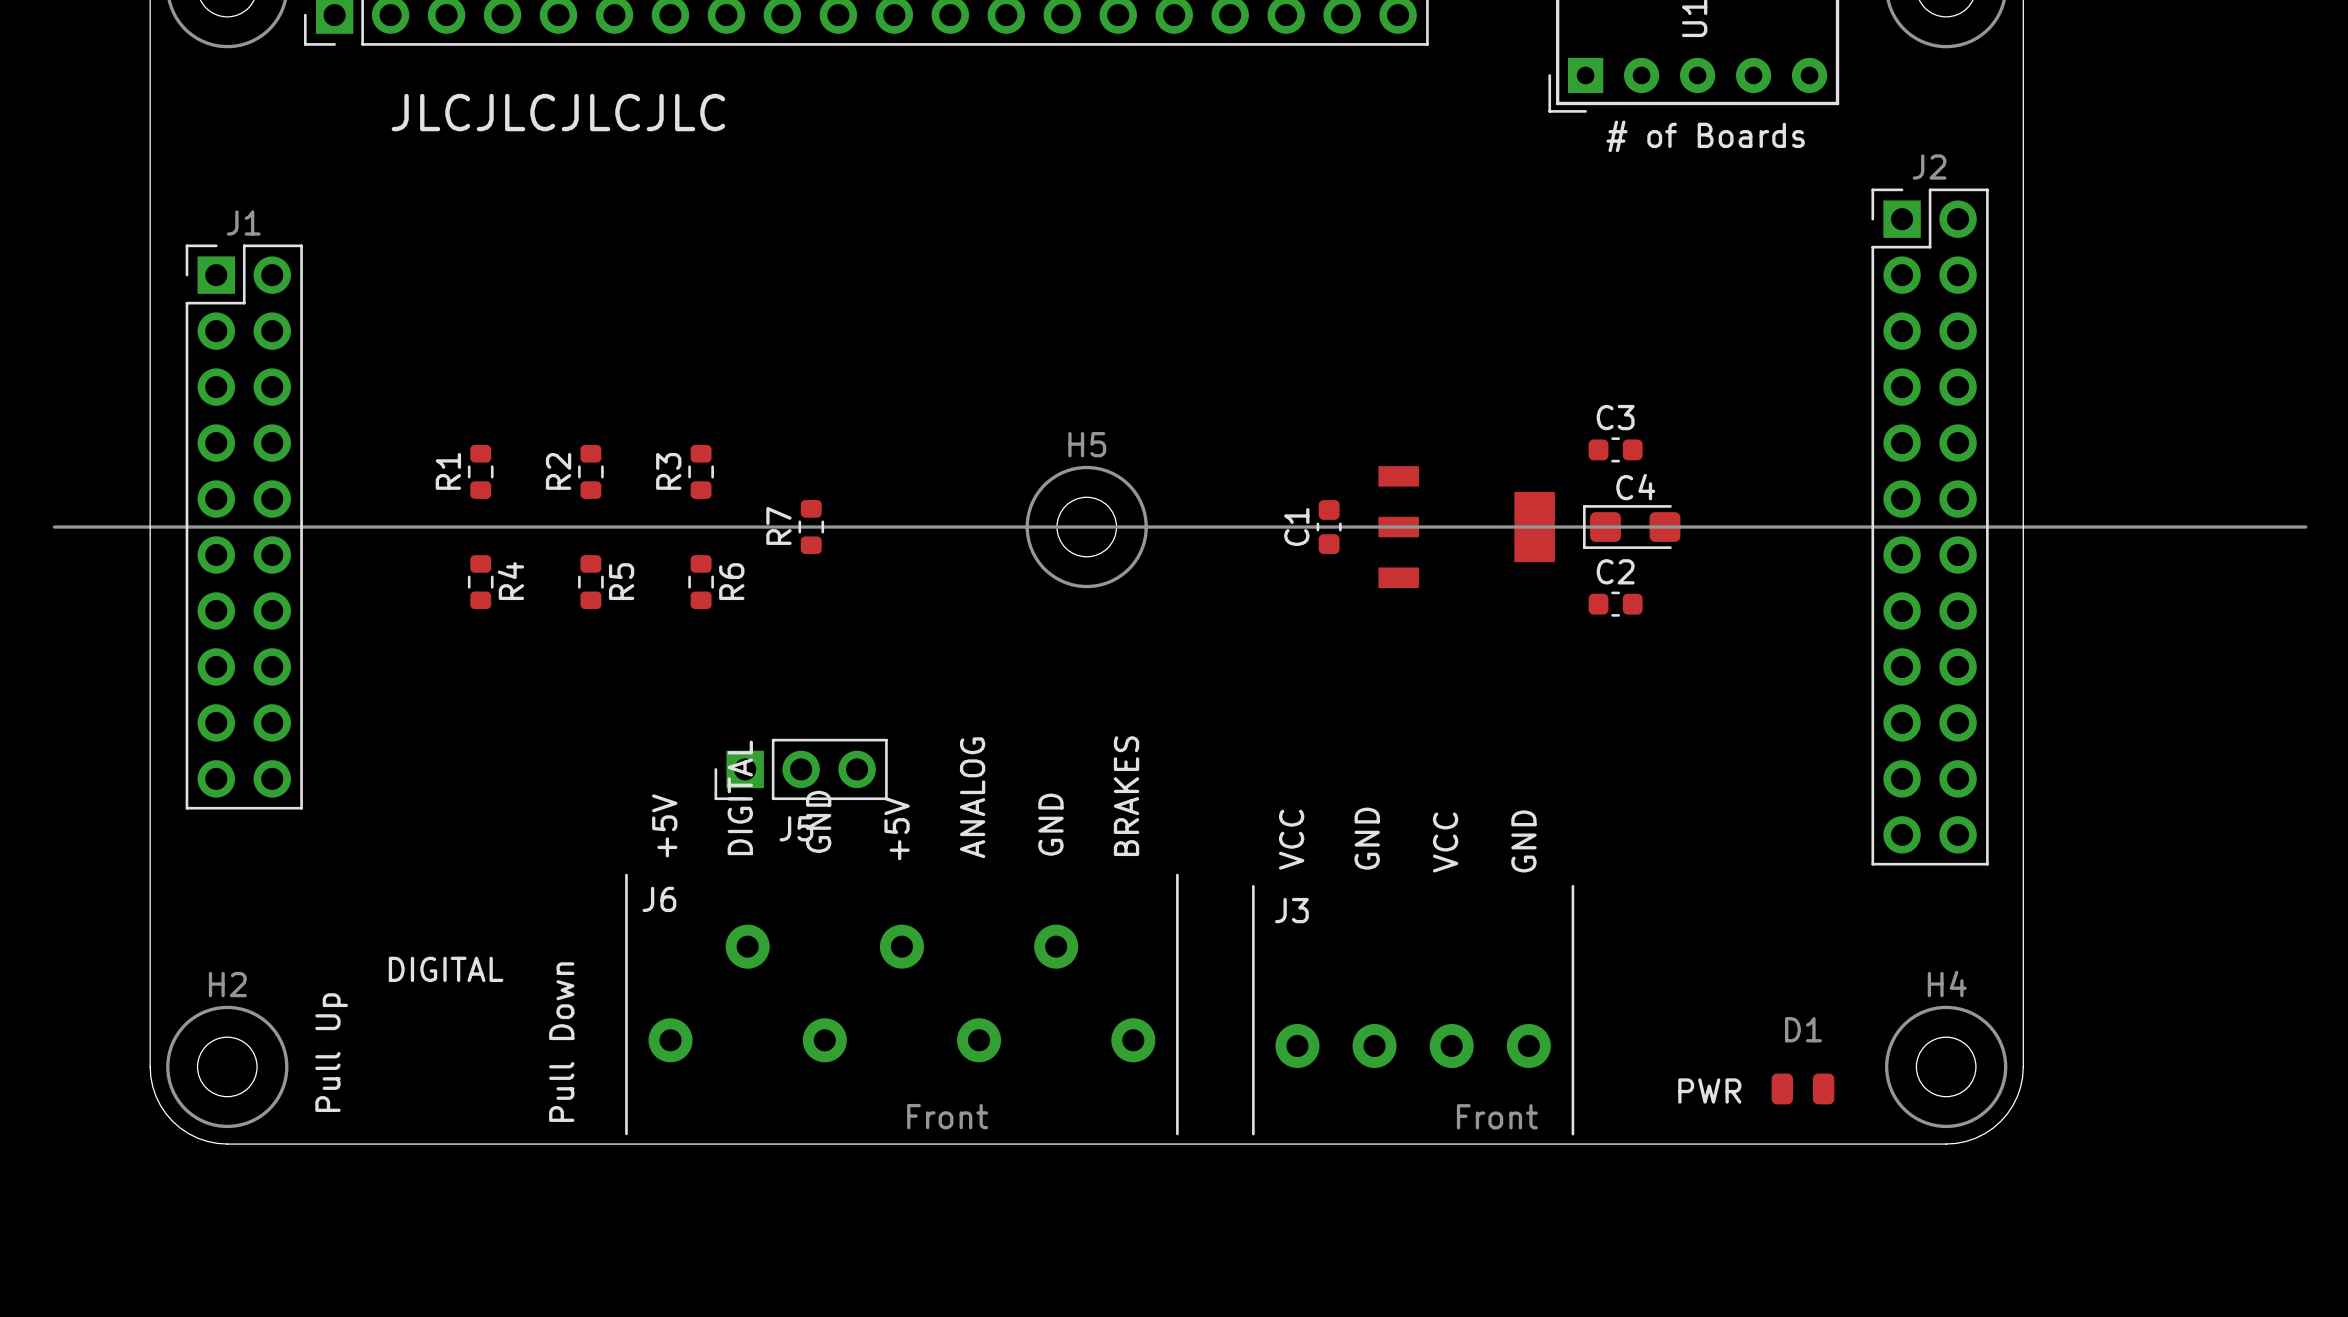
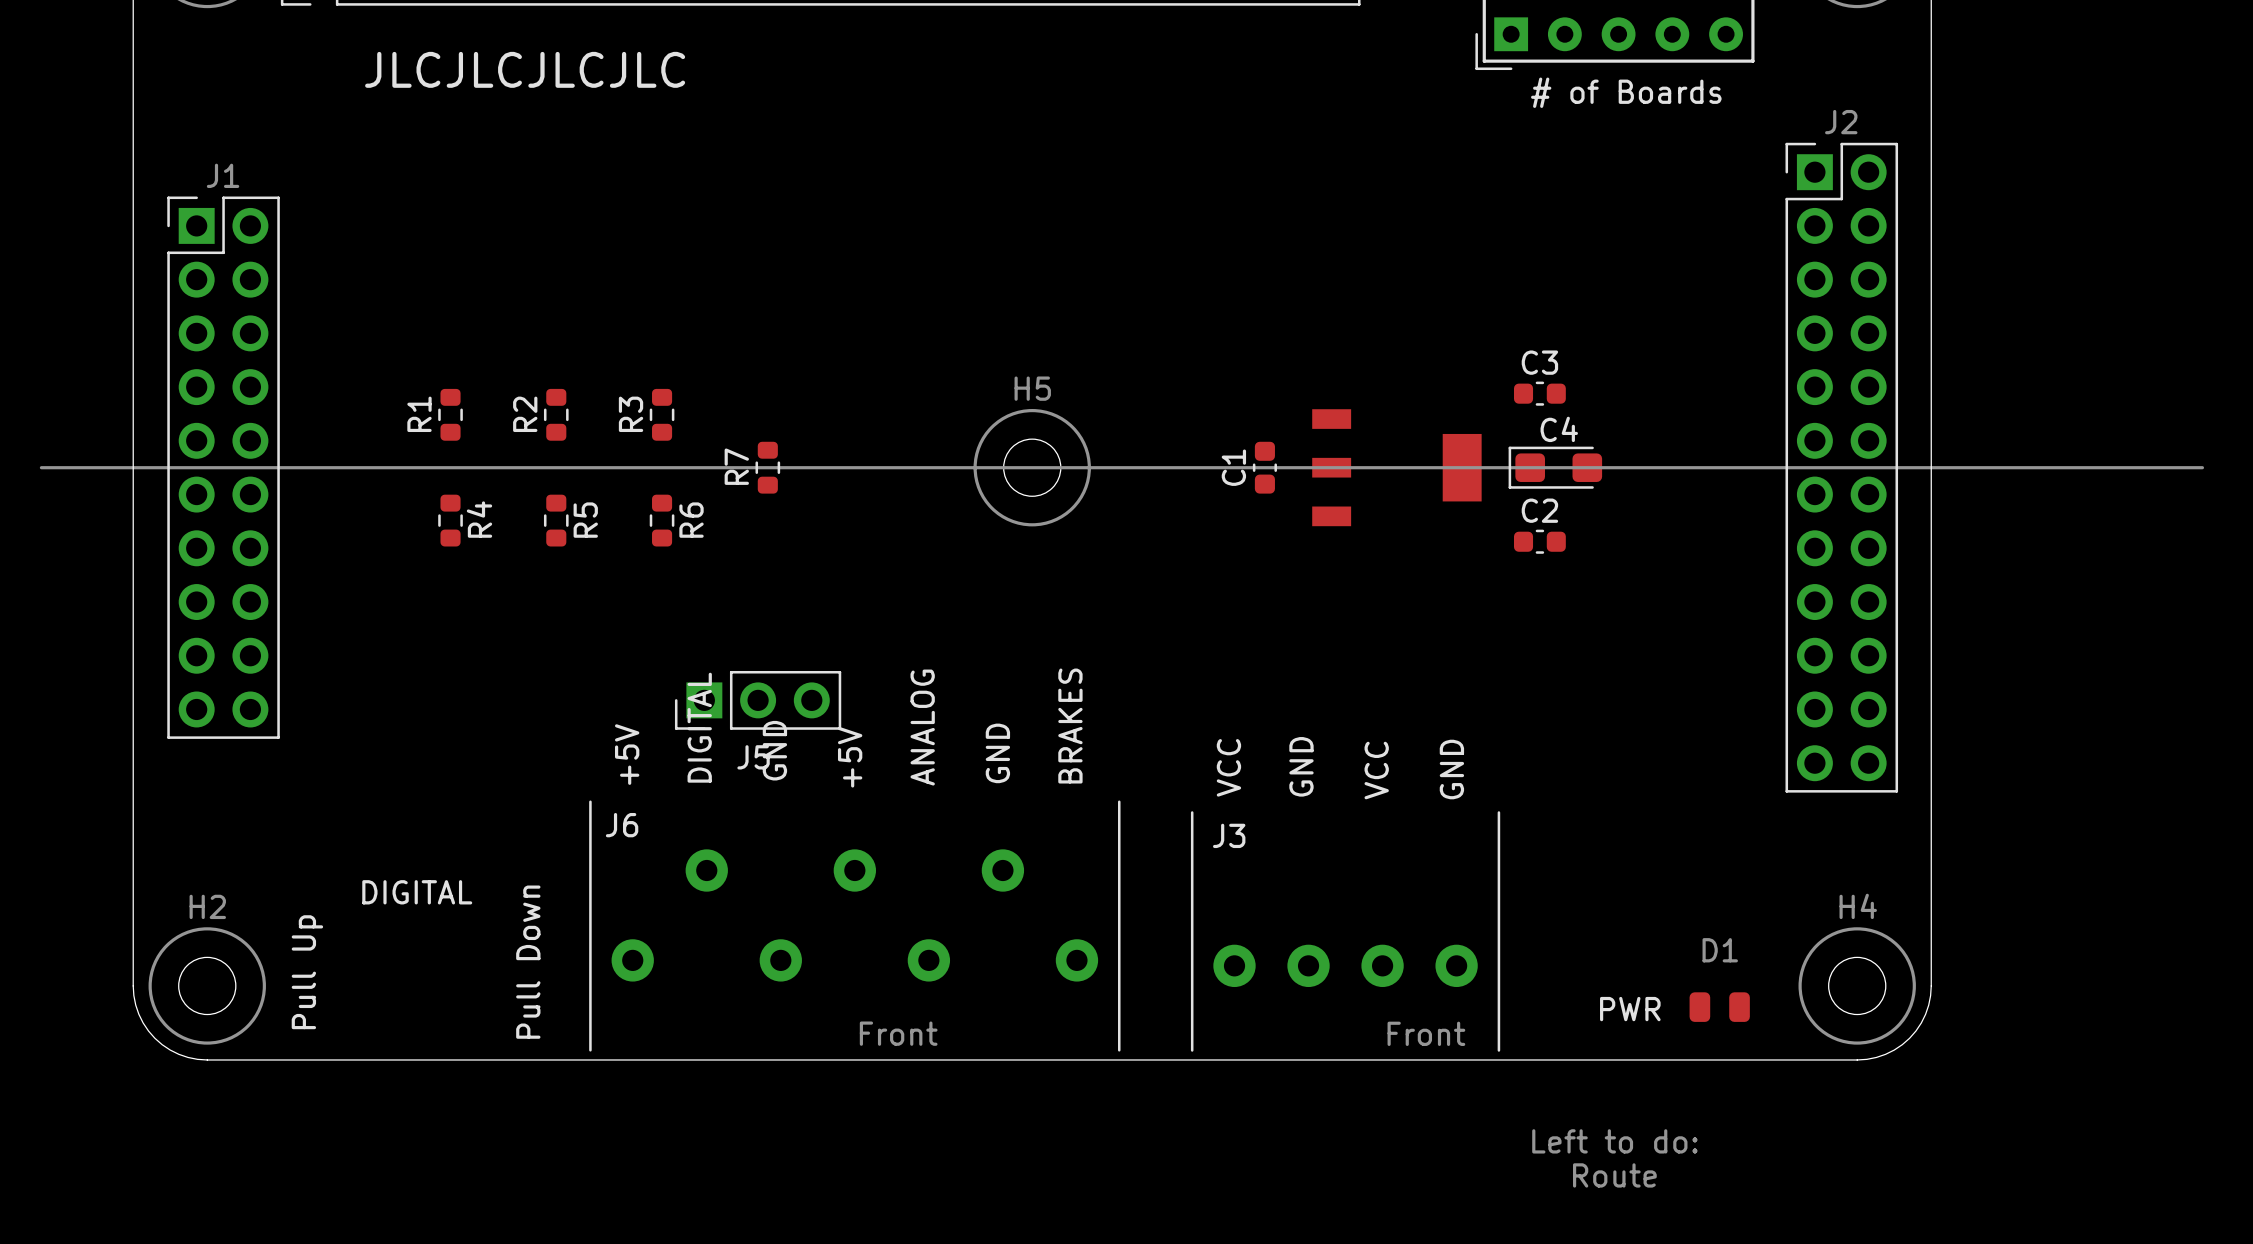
text: none -> Left to do: (1614, 1141)
text: none -> Route (1614, 1175)

